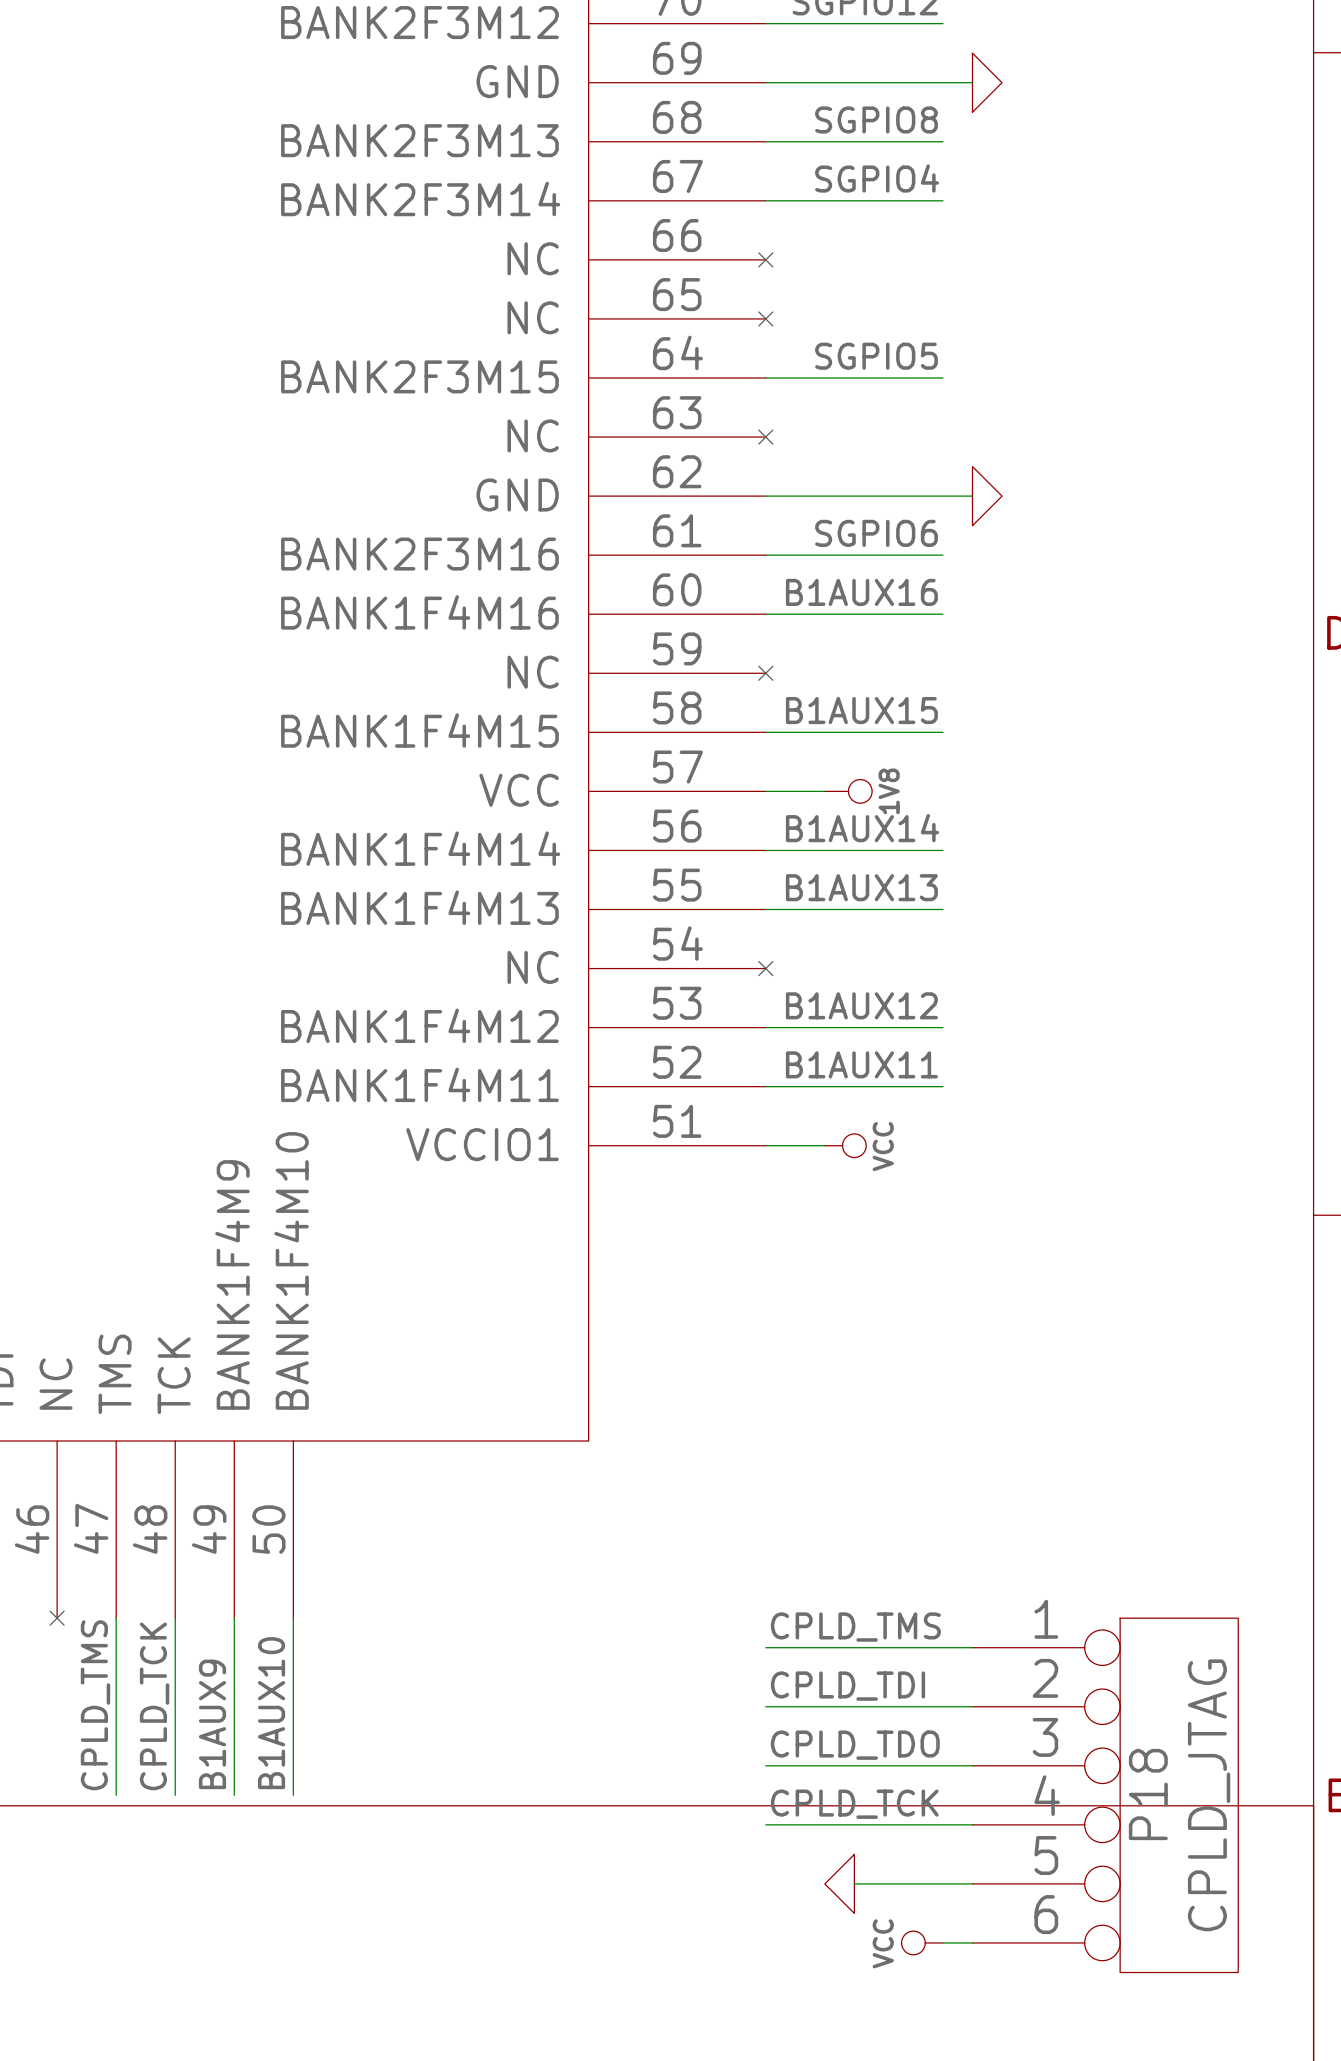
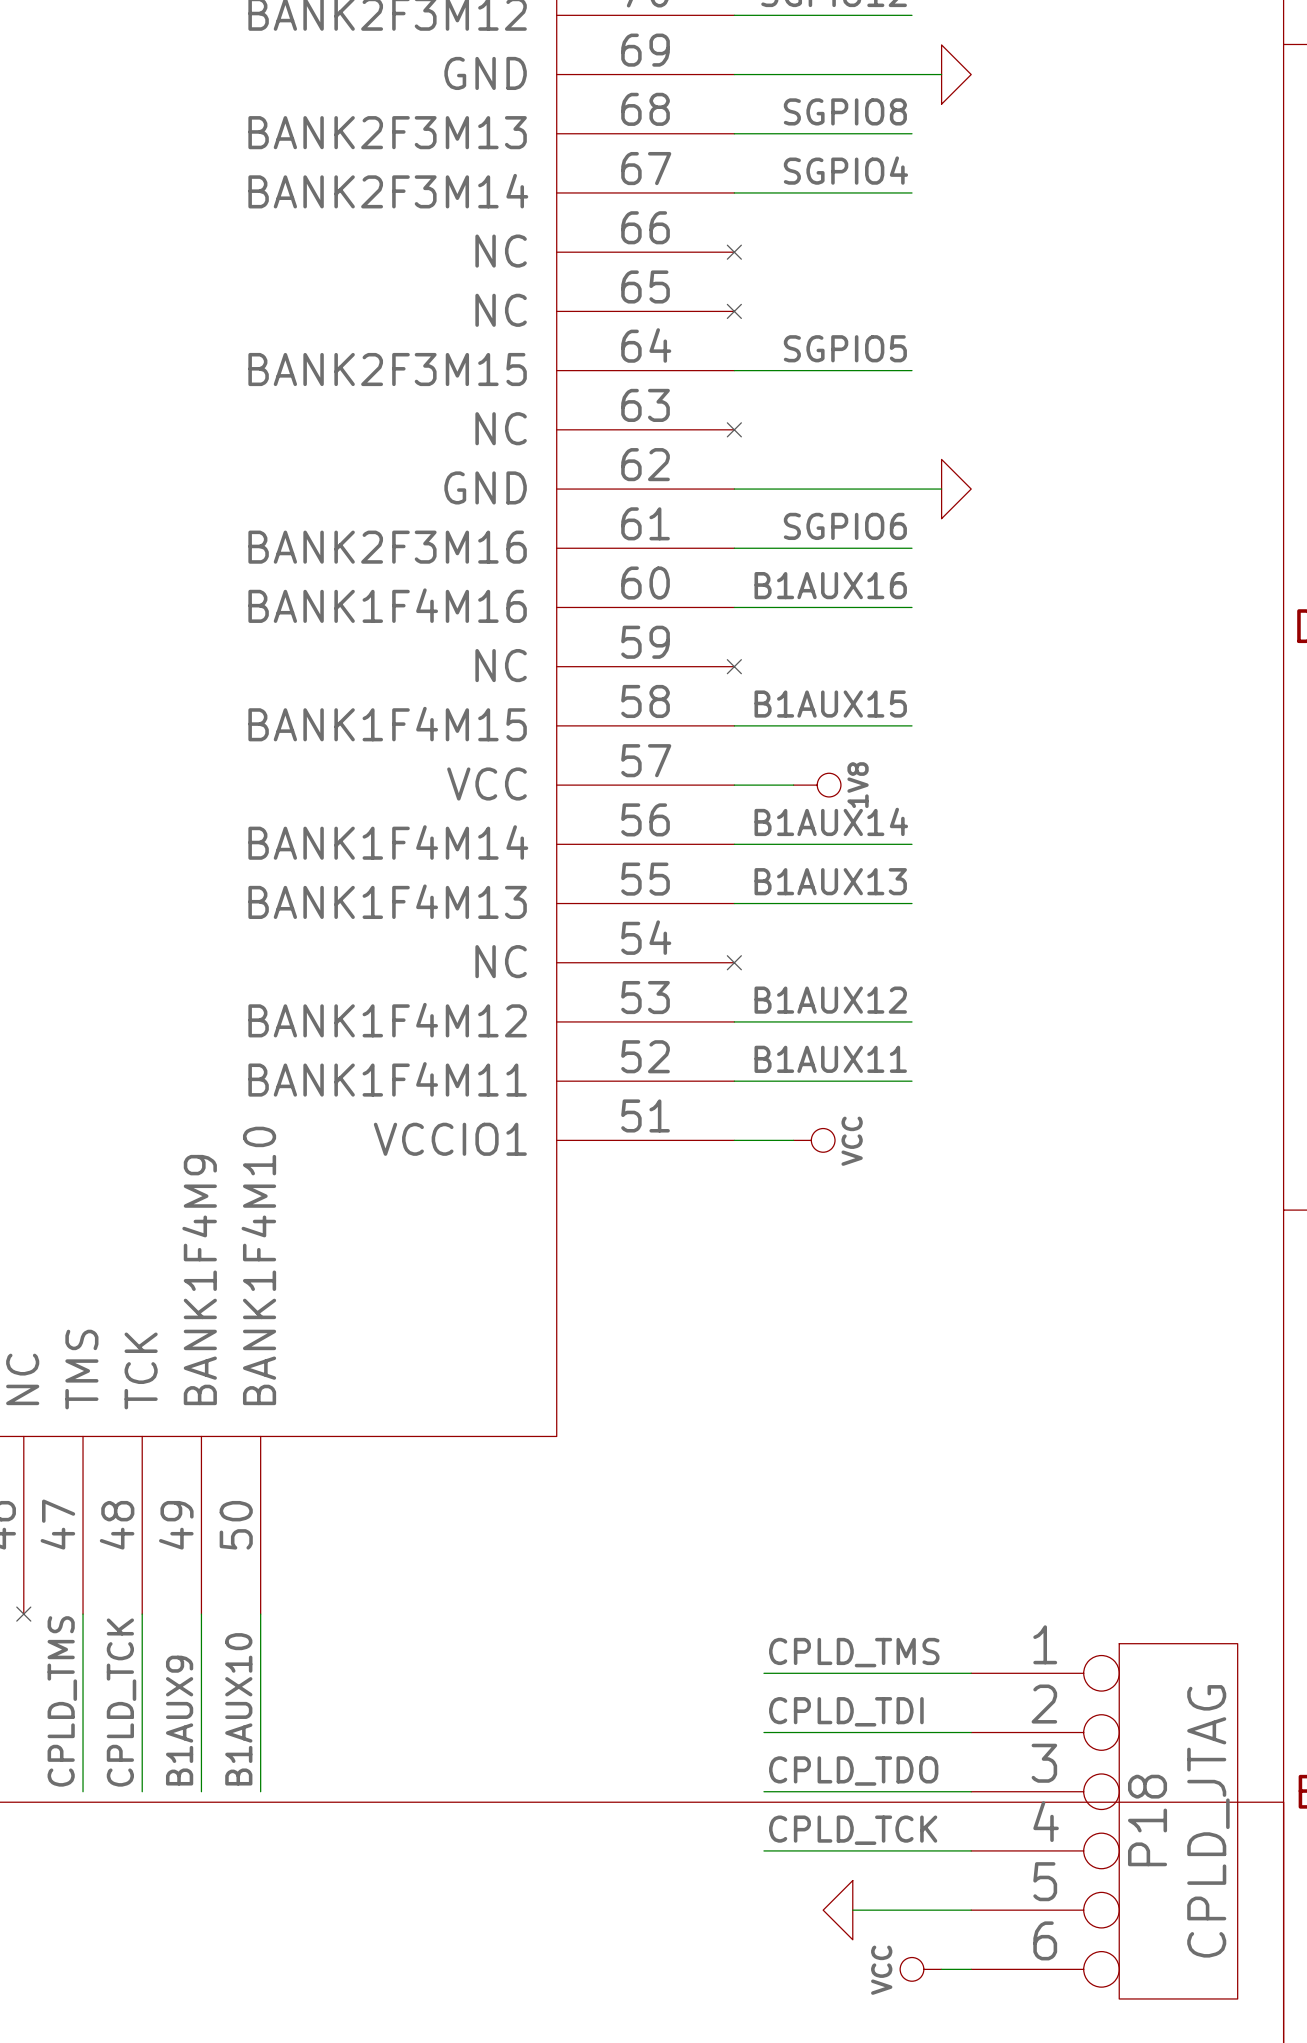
label position: CPLD_TMS (855, 1627) -> CPLD_TMS (854, 1652)
wire: (765, 1647) (972, 1647) -> (763, 1673) (971, 1673)
label position: CPLD_TDI (847, 1686) -> CPLD_TDI (846, 1711)
wire: (765, 1706) (972, 1706) -> (763, 1732) (971, 1732)
label position: CPLD_TDO (855, 1745) -> CPLD_TDO (853, 1771)
wire: (765, 1765) (972, 1765) -> (763, 1791) (971, 1791)
P18 position: (1105, 1795) -> (1104, 1821)
label position: CPLD_TCK (854, 1804) -> CPLD_TCK (853, 1830)
wire: (765, 1824) (972, 1824) -> (763, 1850) (971, 1850)
power symbol position: (839, 1883) -> (837, 1910)
wire: (854, 1883) (972, 1883) -> (852, 1910) (971, 1910)
power symbol position: VCC (922, 1942) -> VCC (920, 1969)
wire: (942, 1942) (972, 1942) -> (941, 1969) (971, 1969)

